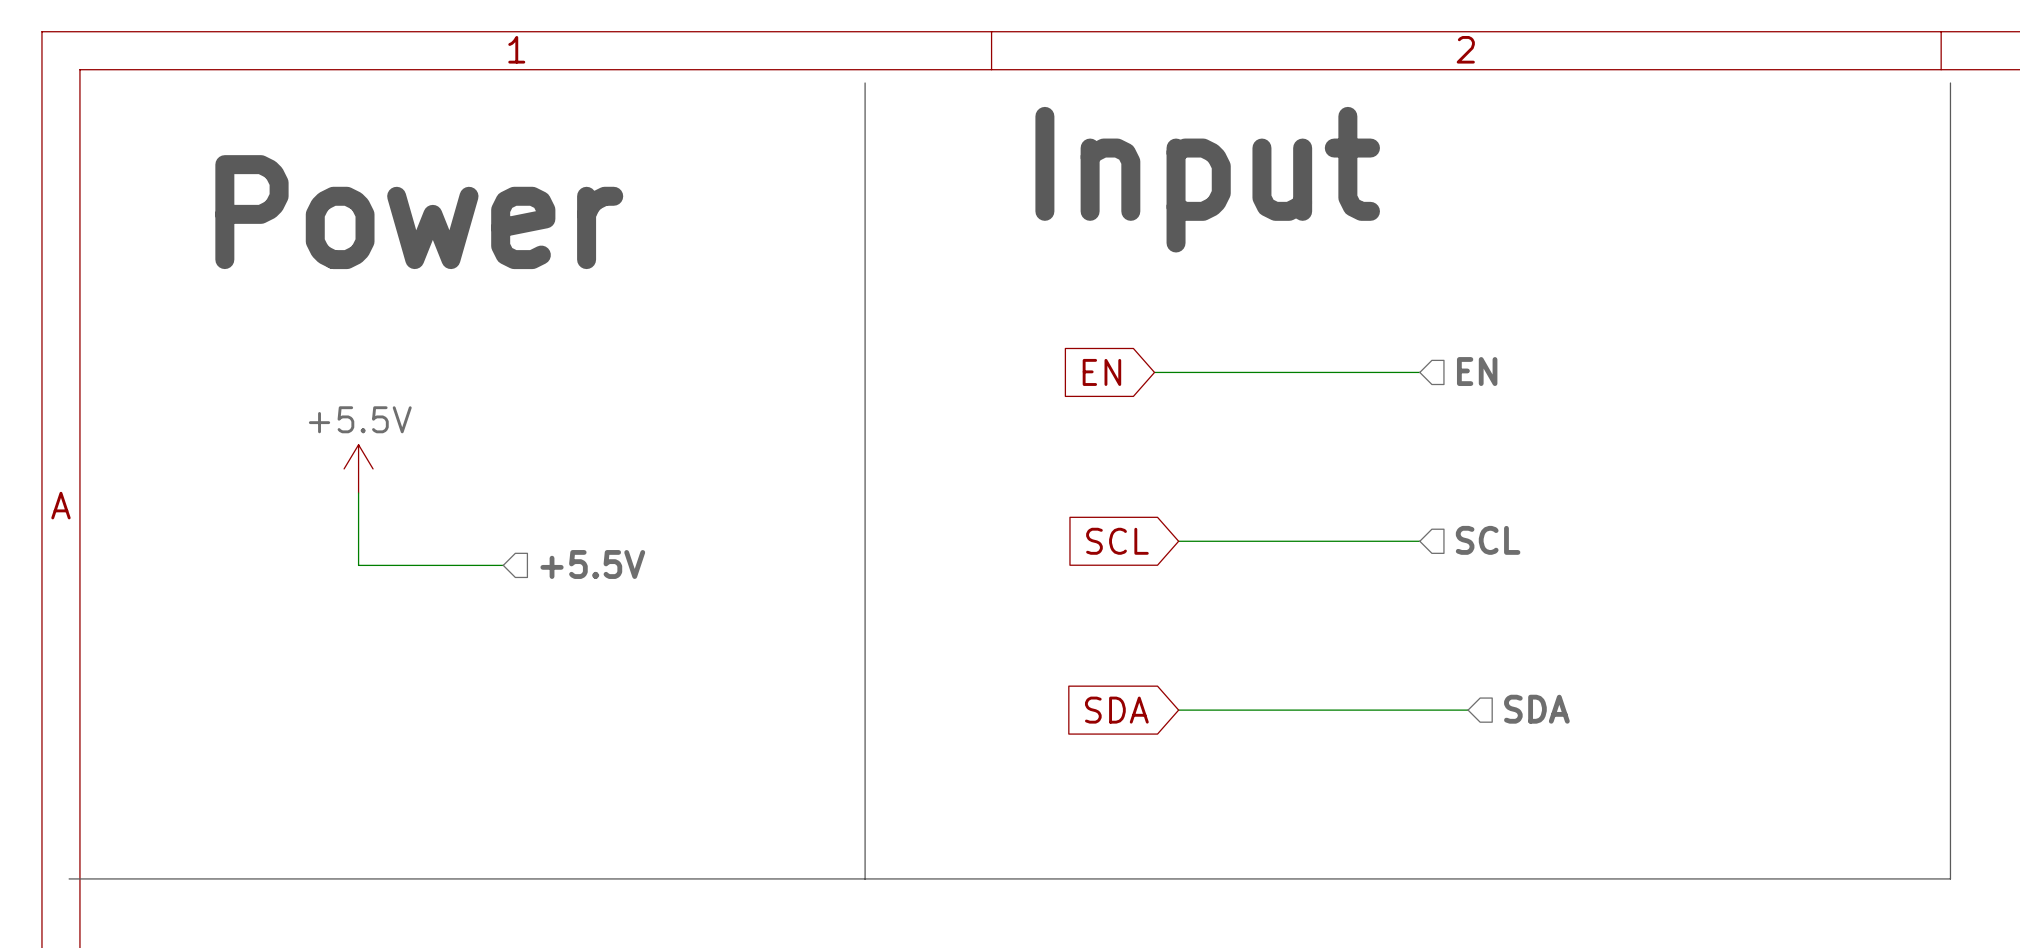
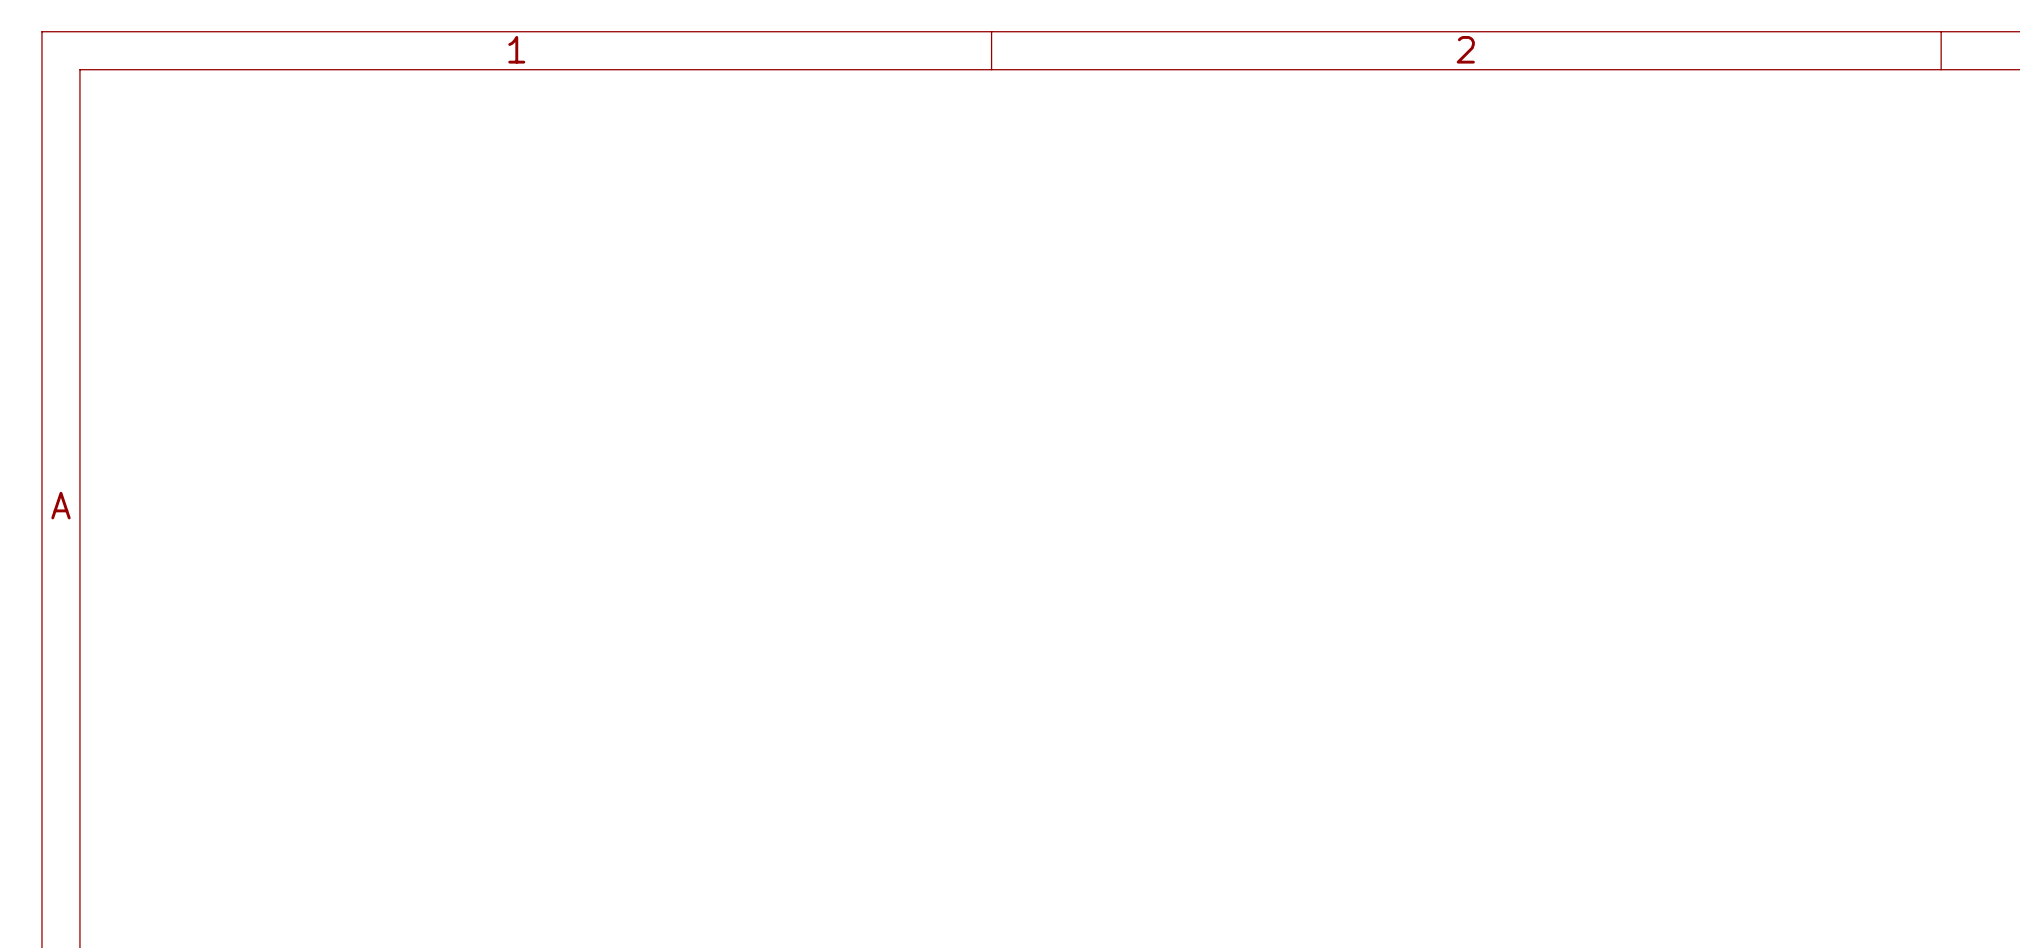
line: (865, 83) (865, 878) -> none
line: (1950, 83) (1950, 878) (69, 878) -> none
text: Input (1207, 179) -> none
text: Power (419, 212) -> none
hierarchical label: EN (1477, 371) -> none
global label: EN (1101, 372) -> none
wire: (1154, 372) (1419, 372) -> none
power symbol: +5.5V (358, 468) -> none
wire: (358, 493) (358, 565) (503, 565) -> none
hierarchical label: SCL (1488, 540) -> none
global label: SCL (1117, 541) -> none
wire: (1178, 541) (1419, 541) -> none
hierarchical label: +5.5V (592, 564) -> none
hierarchical label: SDA (1536, 709) -> none
global label: SDA (1116, 710) -> none
wire: (1178, 710) (1468, 710) -> none

